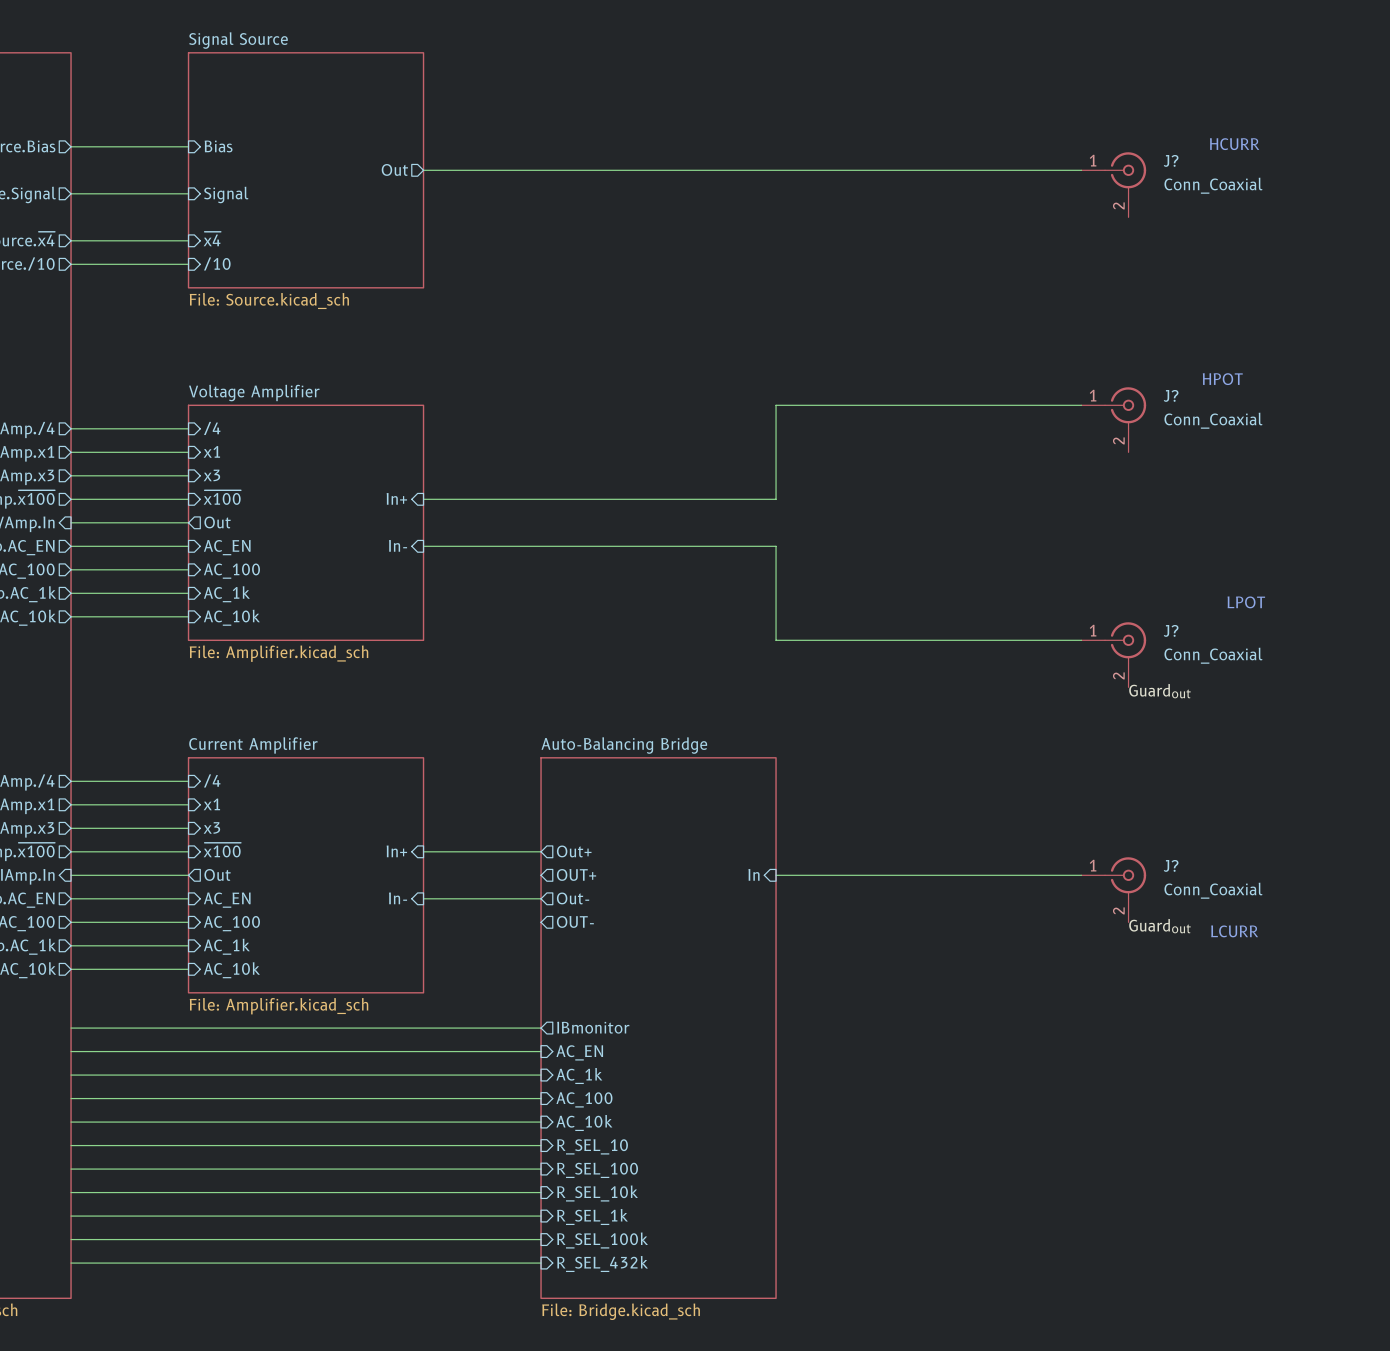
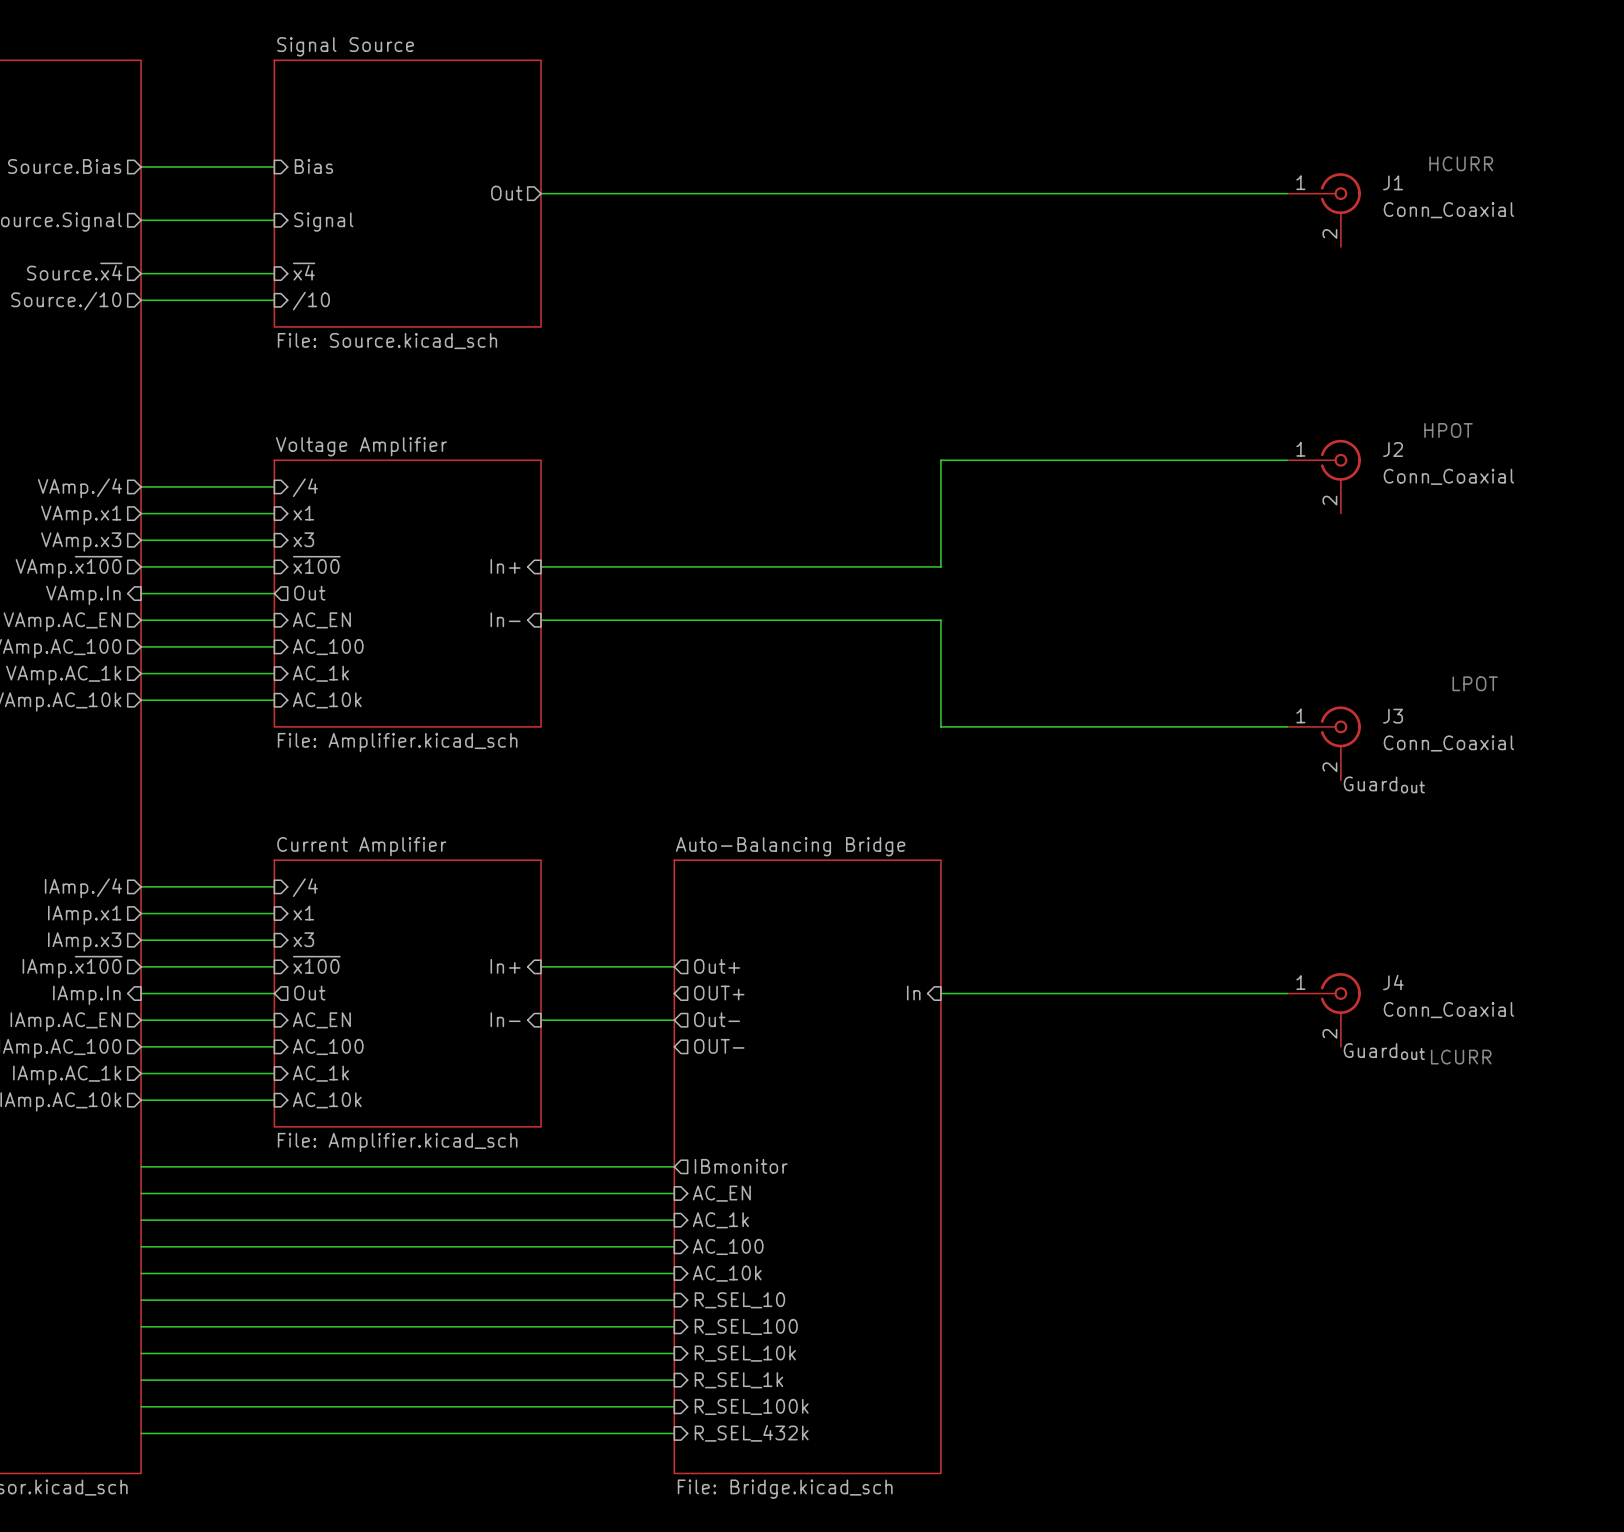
J? name: J? (1171, 160) -> J1 (1393, 182)
J? name: J? (1171, 395) -> J2 (1393, 449)
J? name: J? (1171, 630) -> J3 (1393, 716)
J? name: J? (1171, 865) -> J4 (1393, 982)

